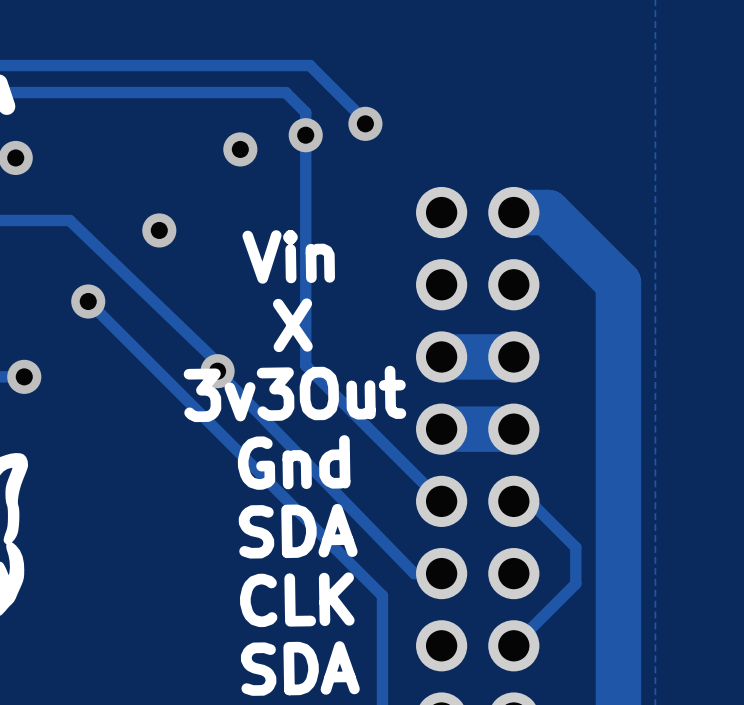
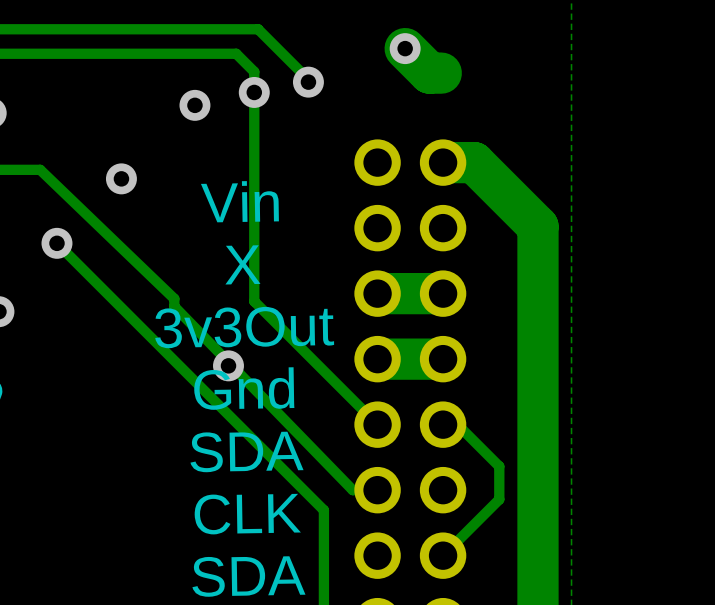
track: none -> (405, 48) (429, 73) (441, 73)
via: none -> (405, 48)
via position: (217, 371) -> (228, 365)

